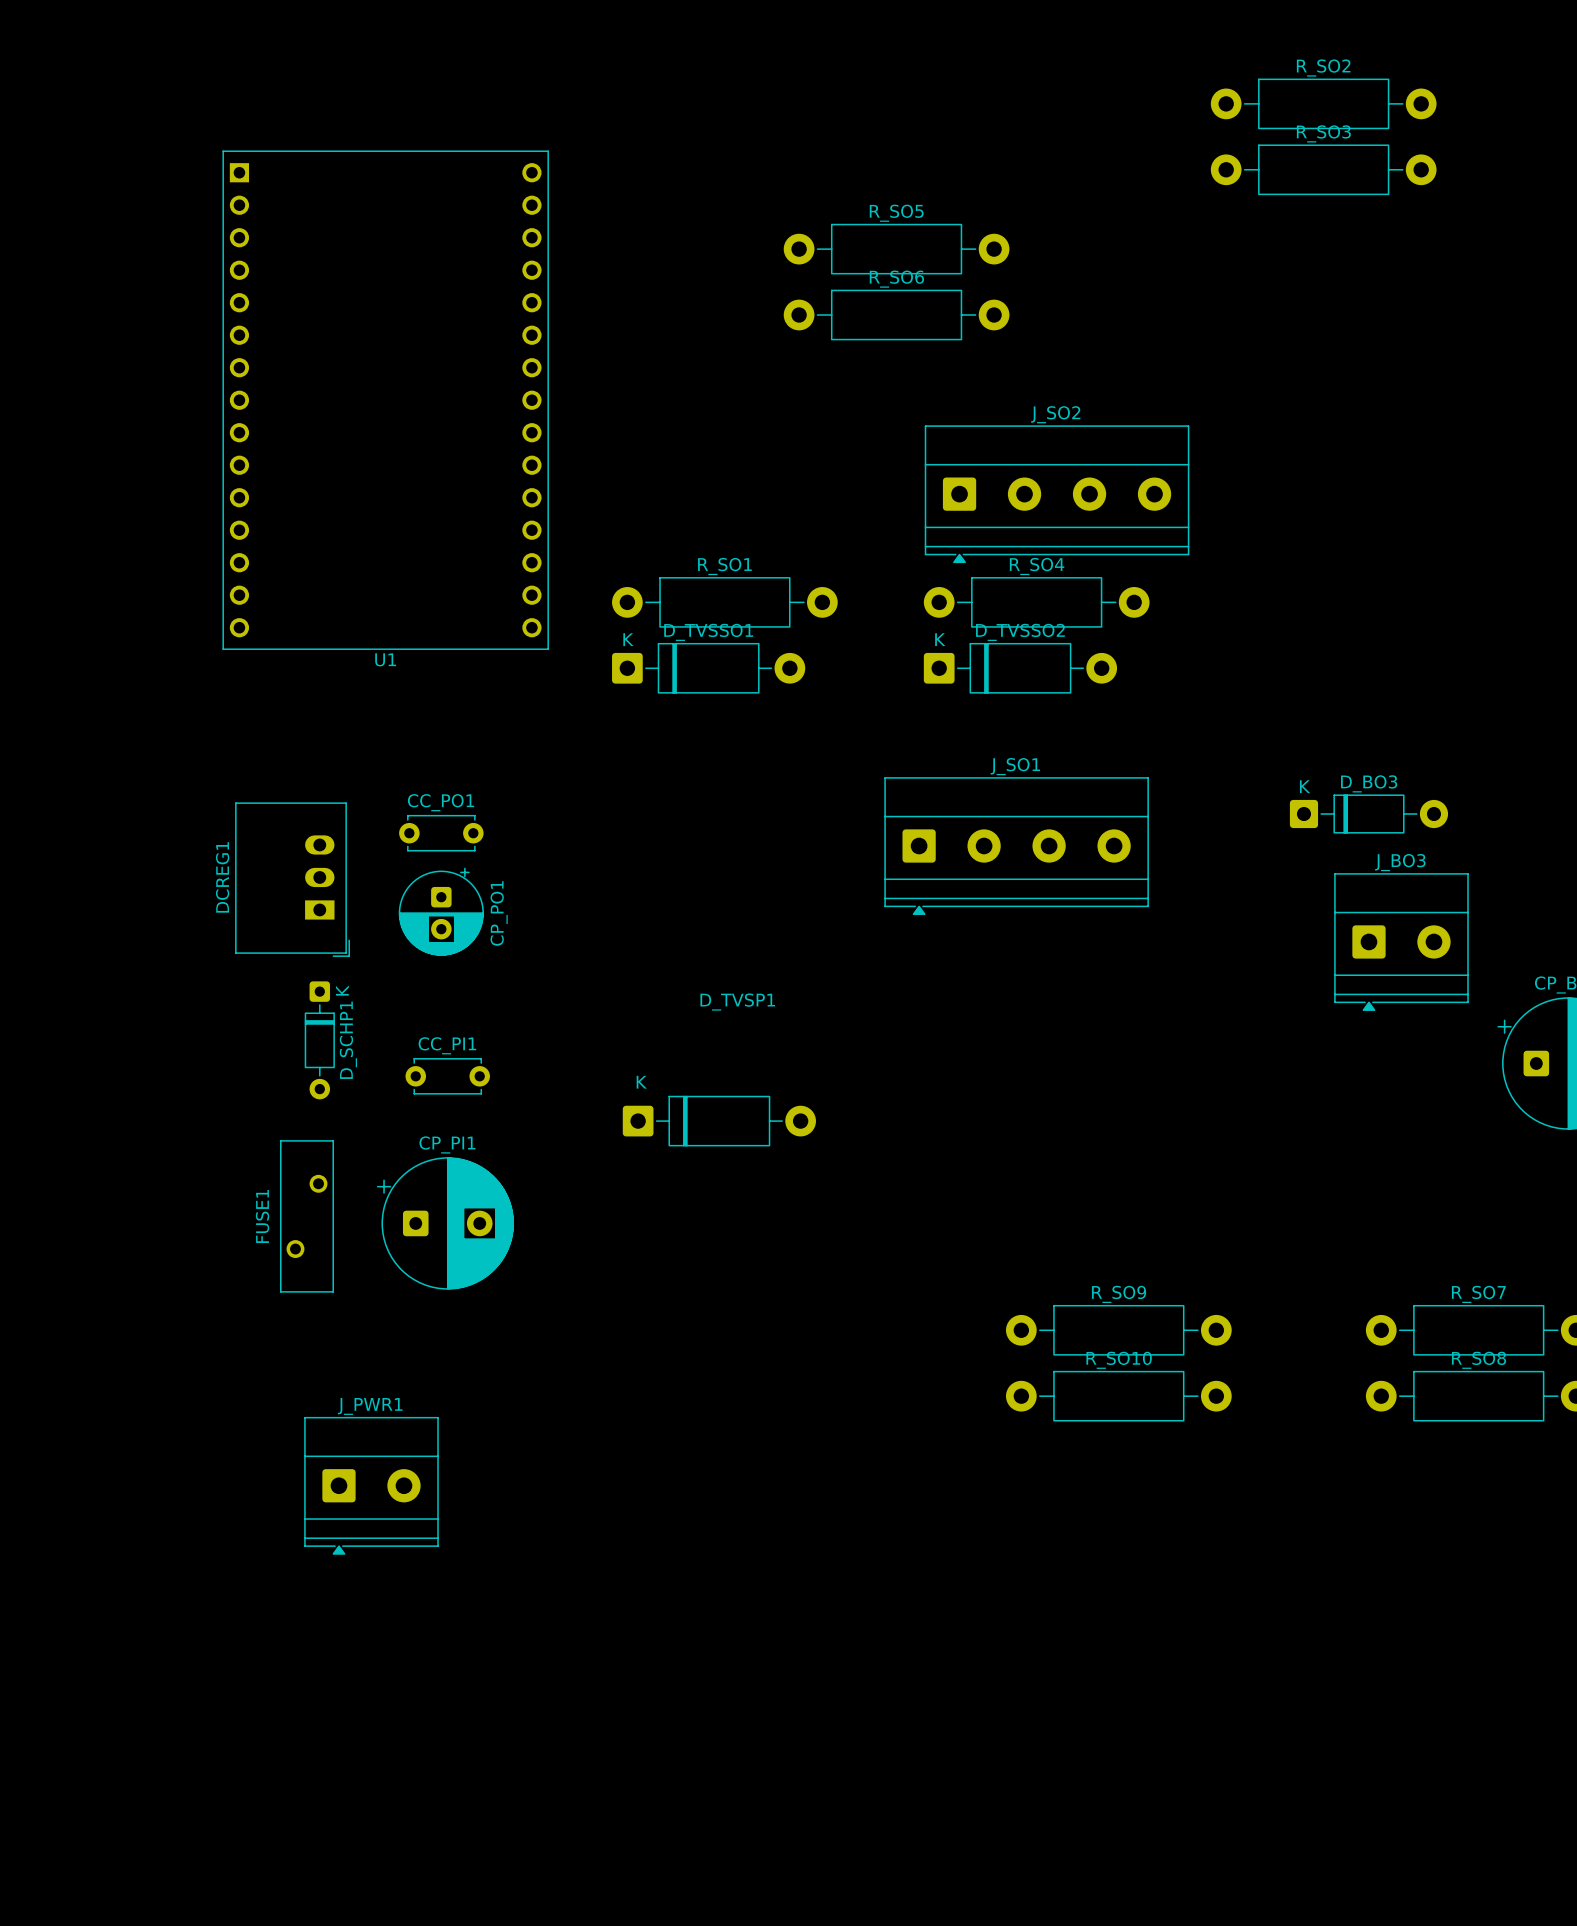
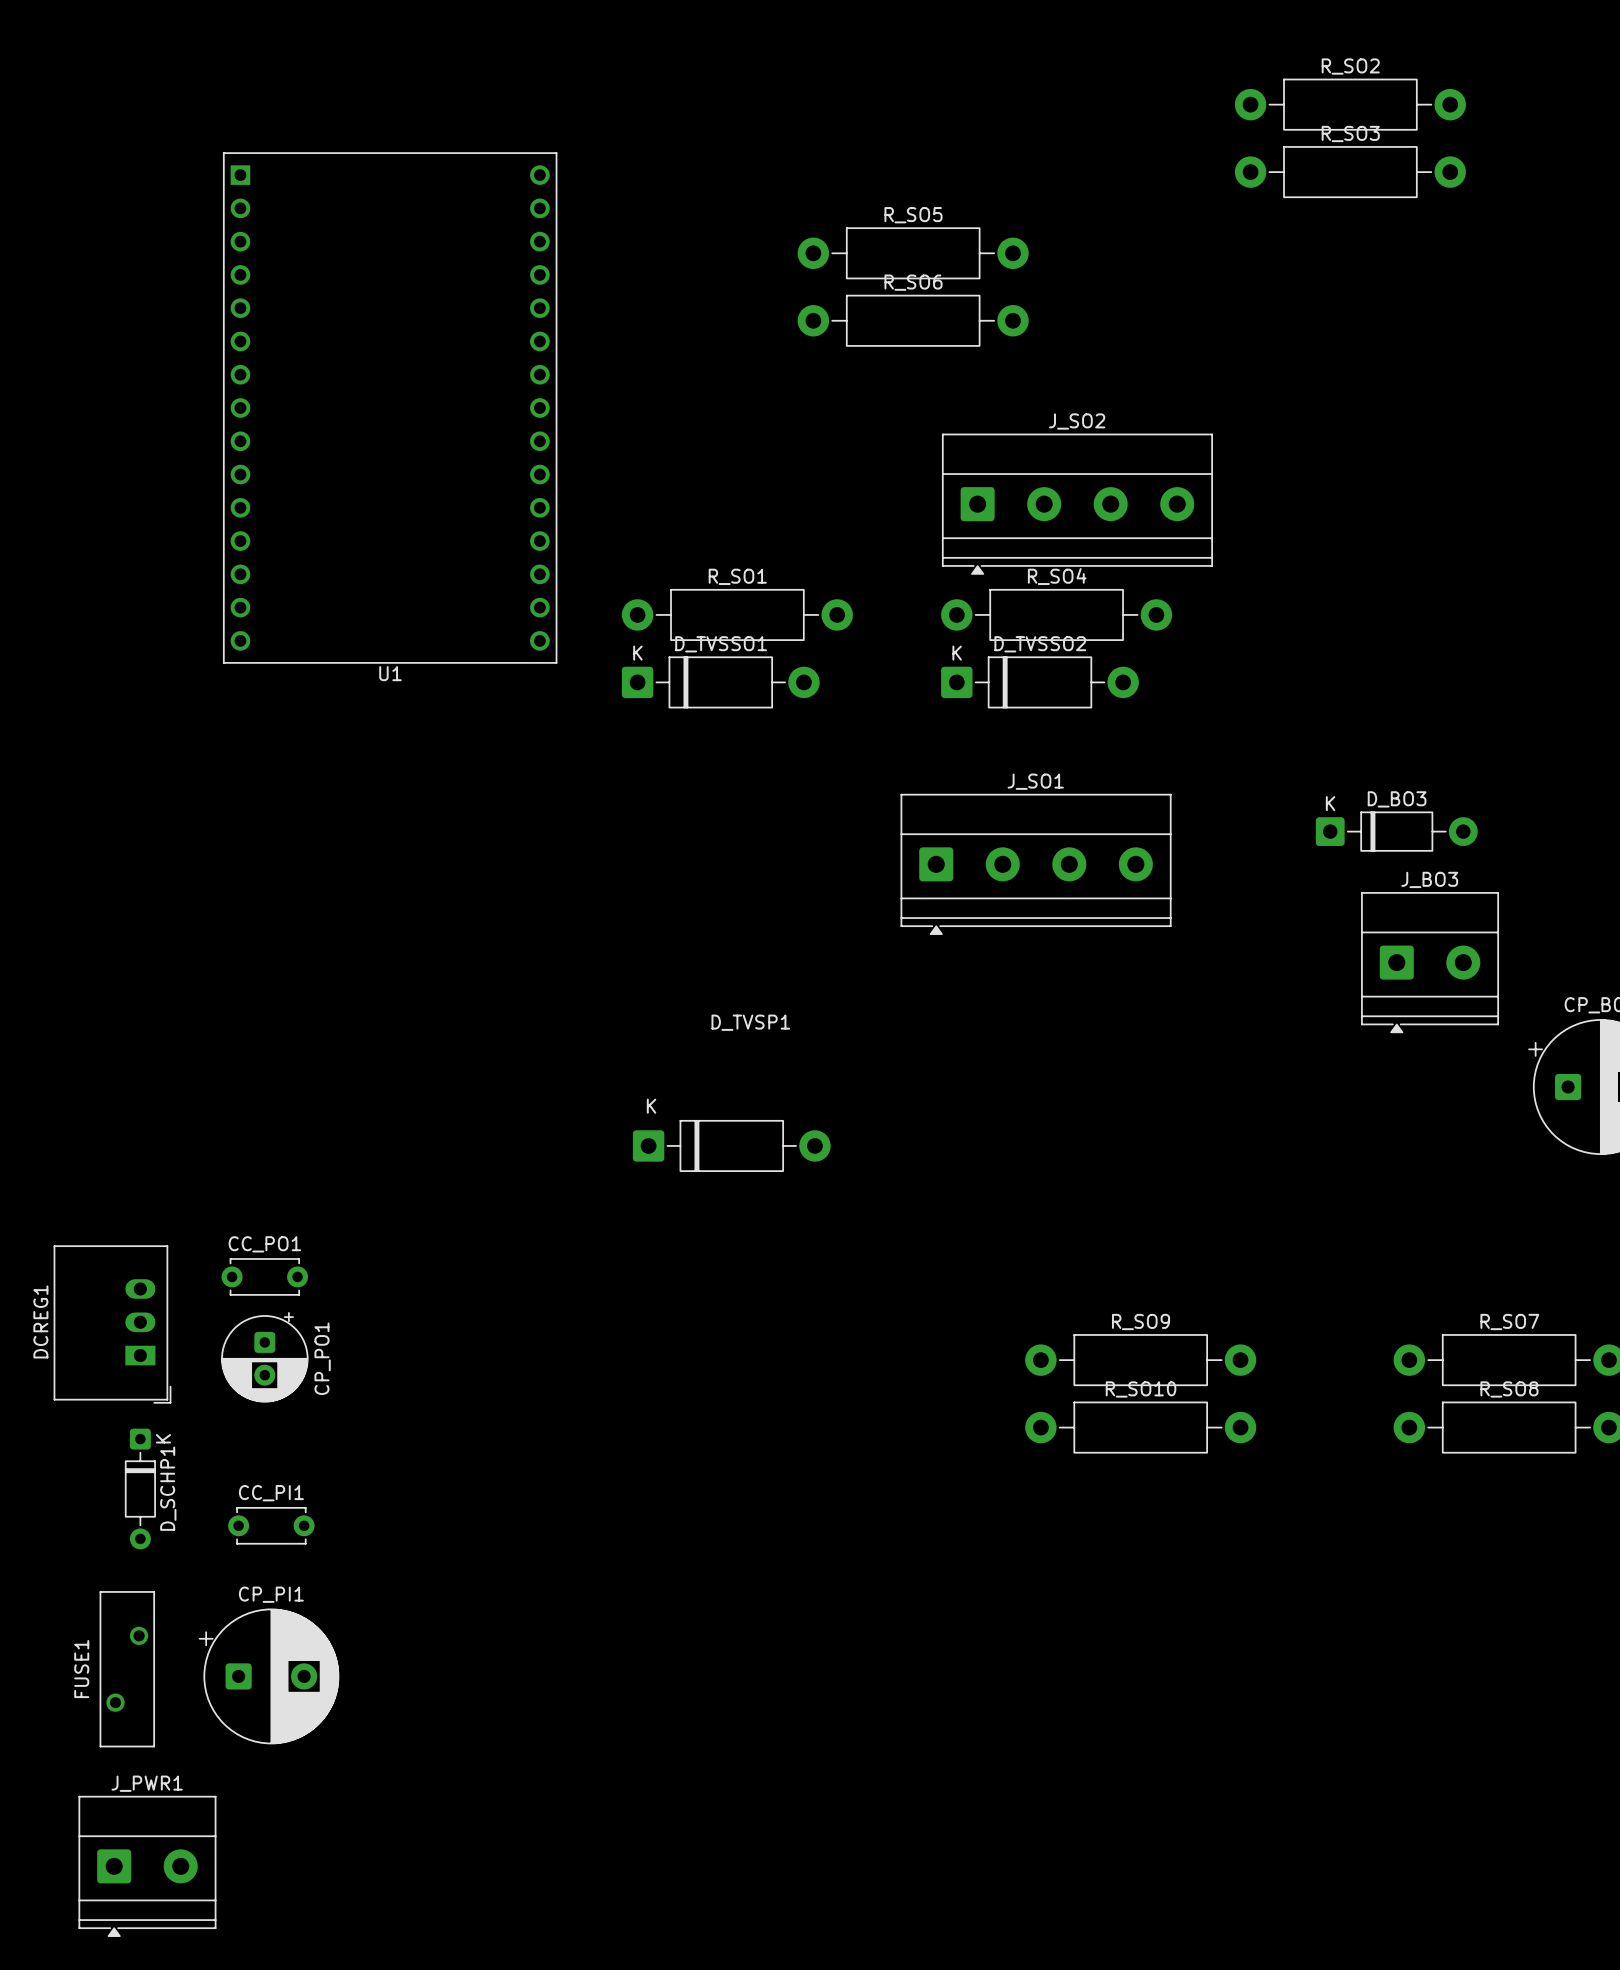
CC_PO1 position: (441, 833) -> (264, 1276)
DCREG1 position: (292, 879) -> (112, 1324)
CP_PO1 position: (441, 911) -> (264, 1357)
D_SCHP1 position: (319, 1040) -> (140, 1489)
CC_PI1 position: (447, 1076) -> (271, 1525)
FUSE1 position: (307, 1216) -> (127, 1669)
CP_PI1 position: (445, 1223) -> (269, 1676)
J_PWR1 position: (371, 1485) -> (147, 1866)

